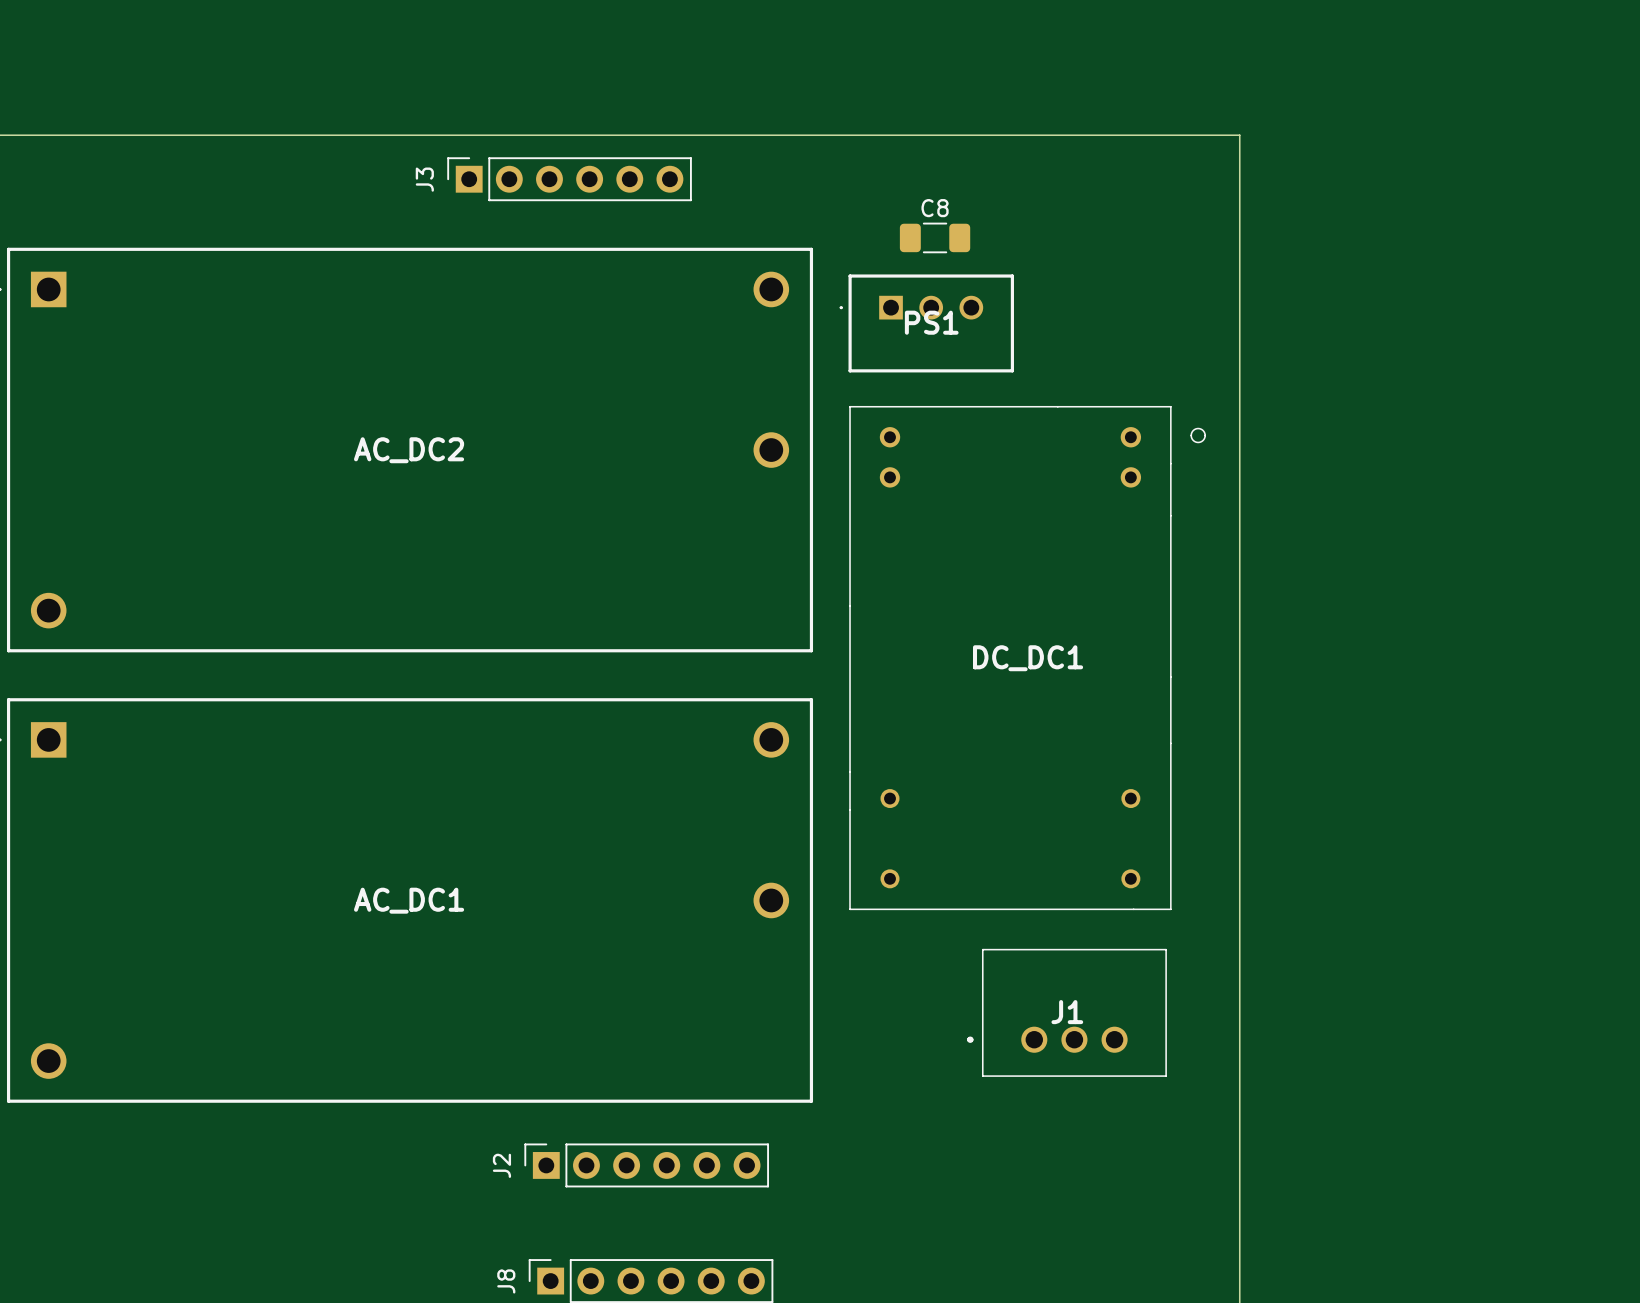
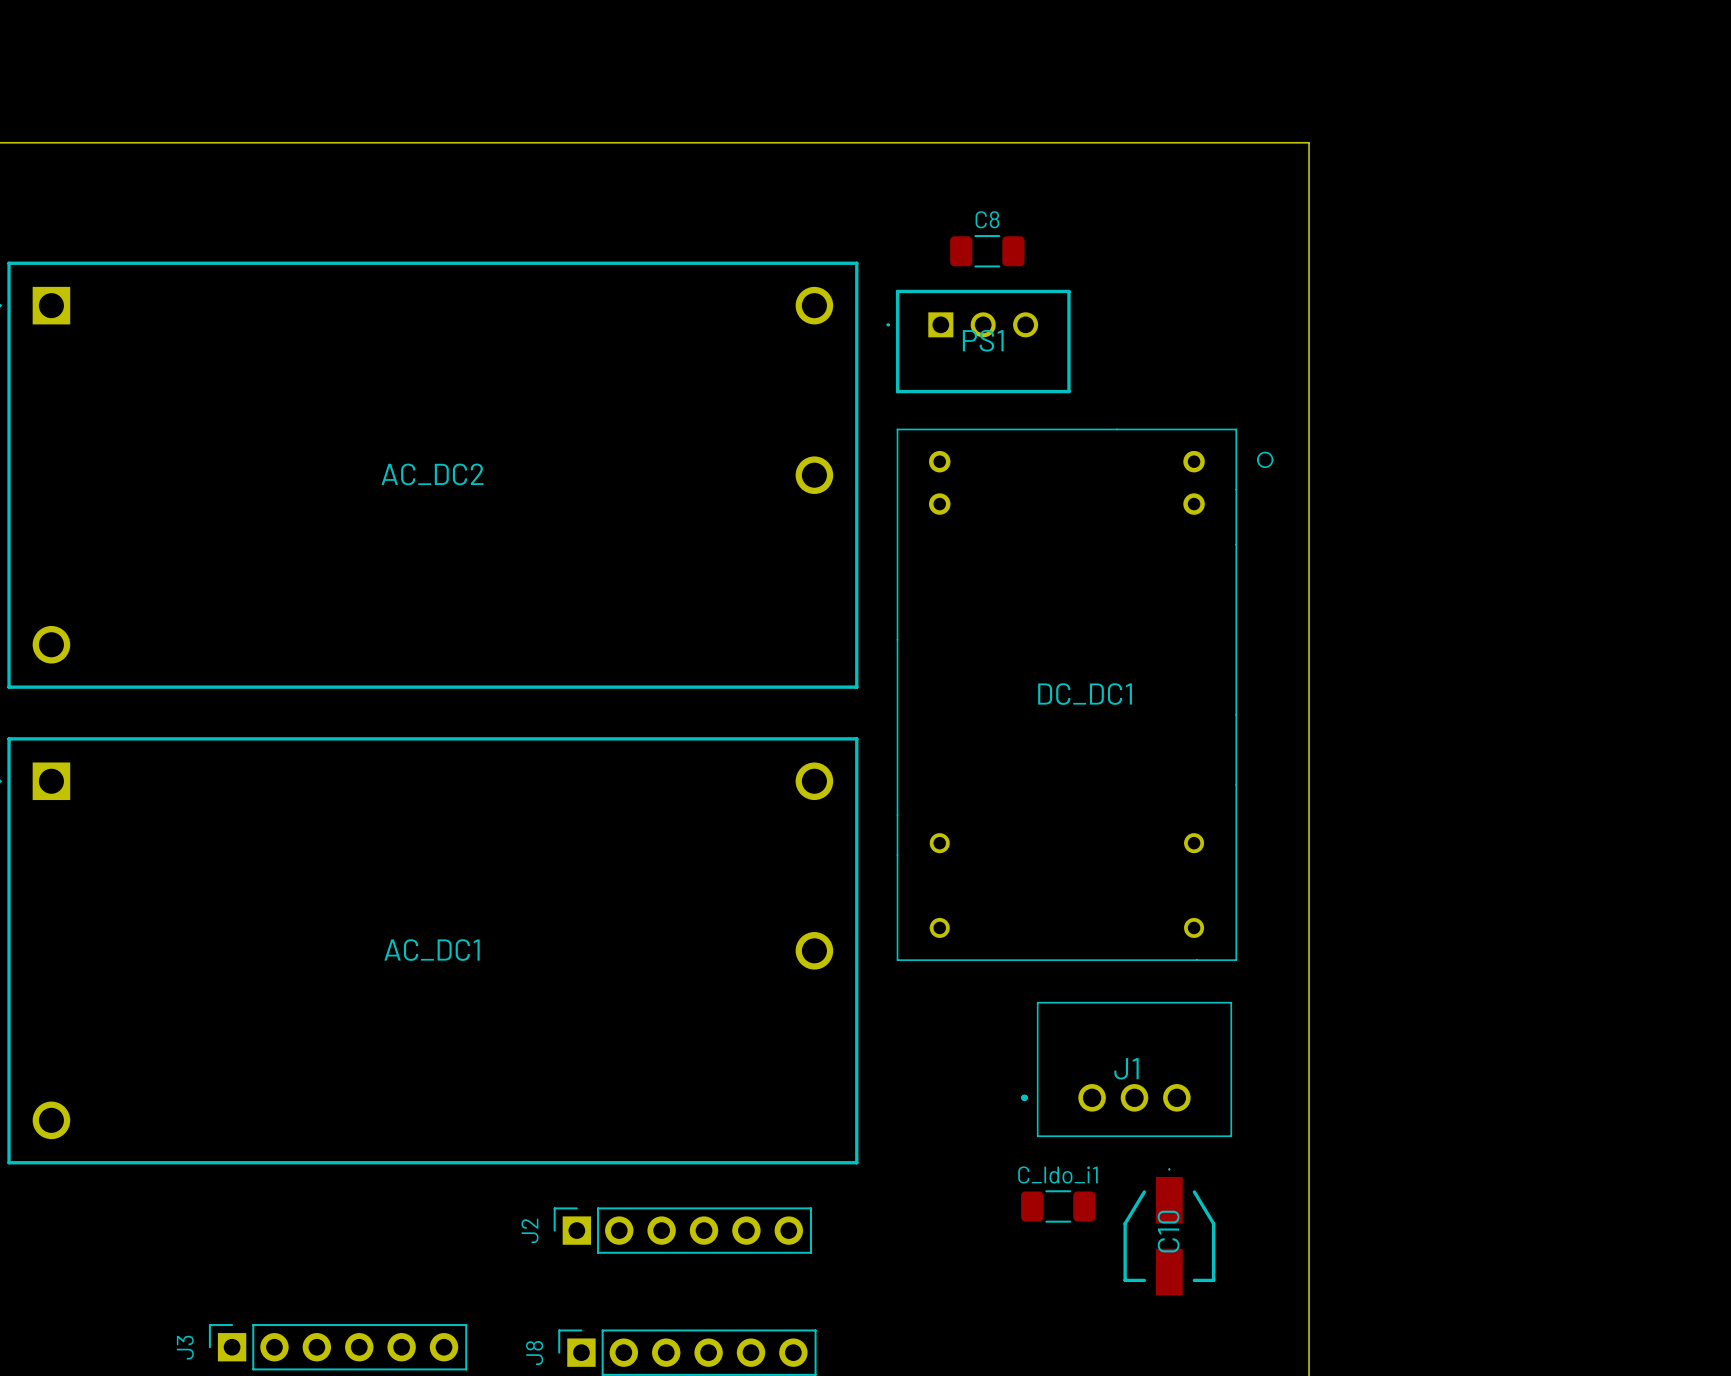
J3 position: (569, 179) -> (338, 1347)
C_ldo_i1: none -> (1058, 1206)
C10: none -> (1169, 1231)

